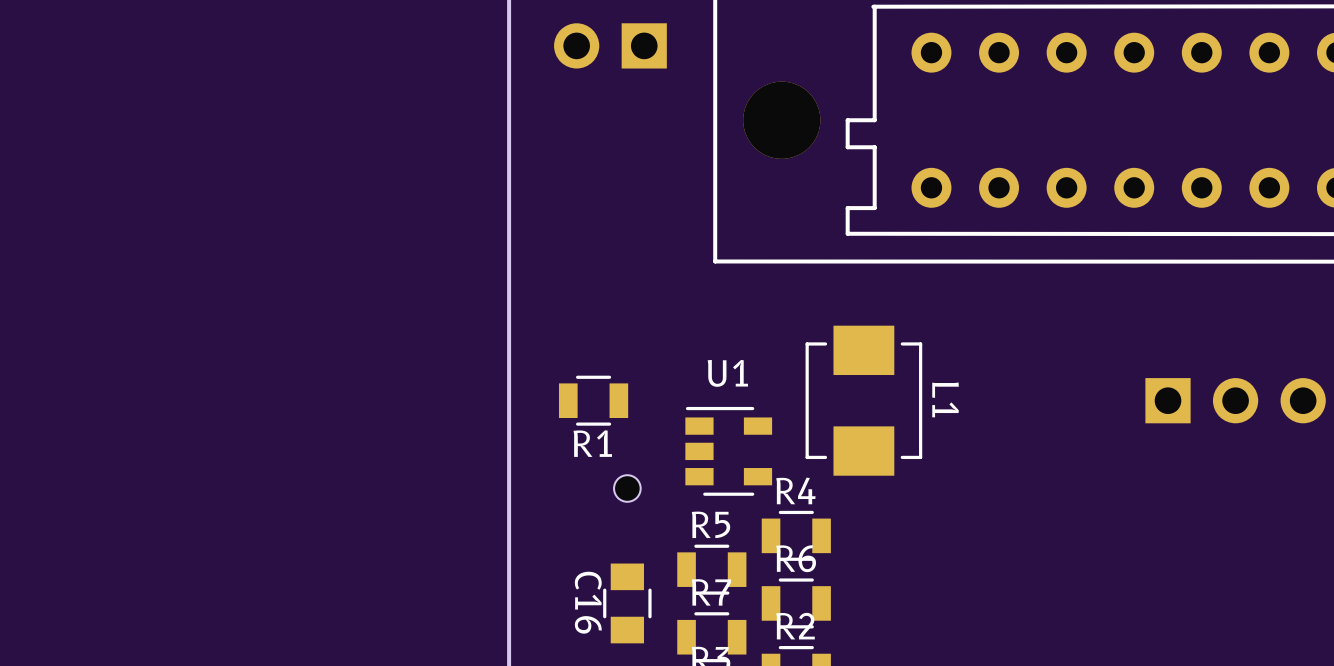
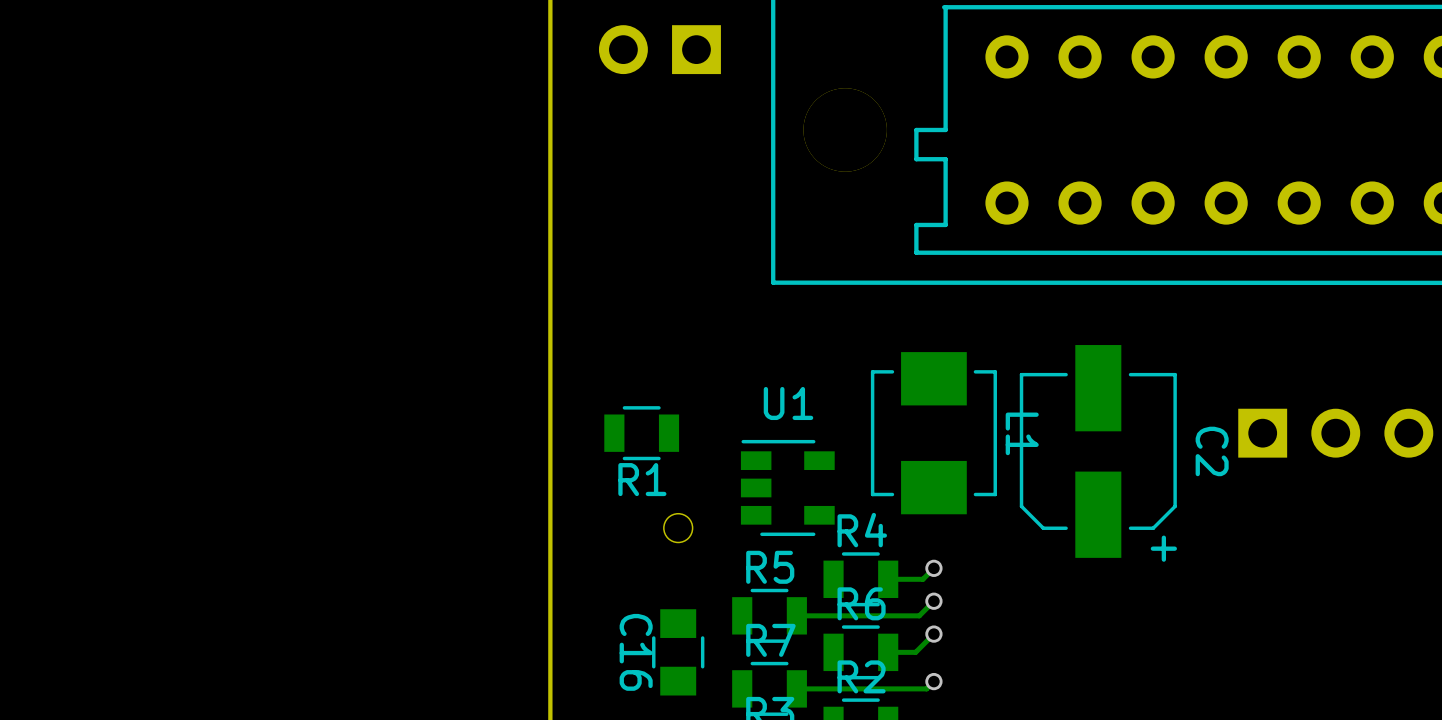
C2: none -> (1098, 451)
track: none -> (933, 568) (922, 579) (888, 579)
via: none -> (933, 568)
track: none -> (933, 601) (919, 615) (796, 615)
via: none -> (933, 601)
track: none -> (933, 634) (915, 652) (888, 652)
via: none -> (933, 634)
track: none -> (933, 681) (926, 688) (796, 688)
via: none -> (933, 681)

